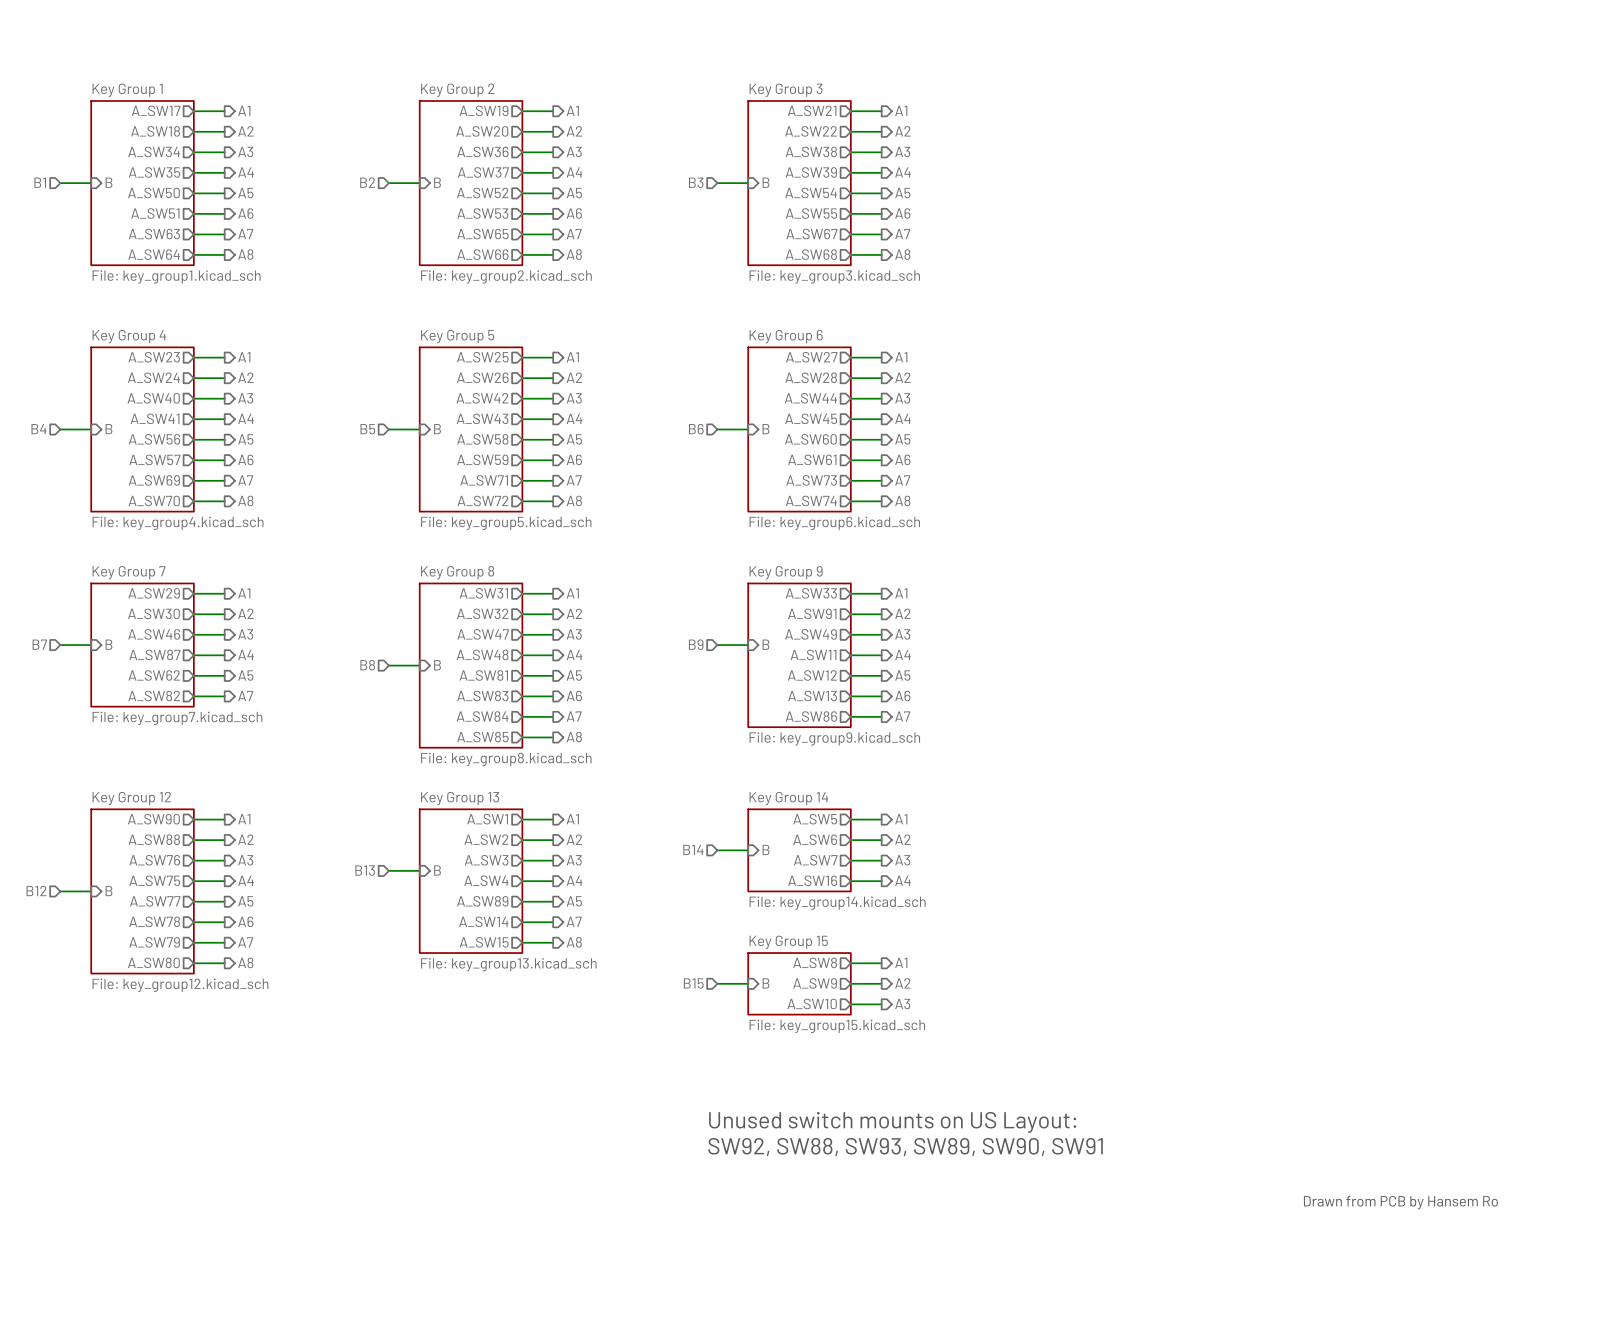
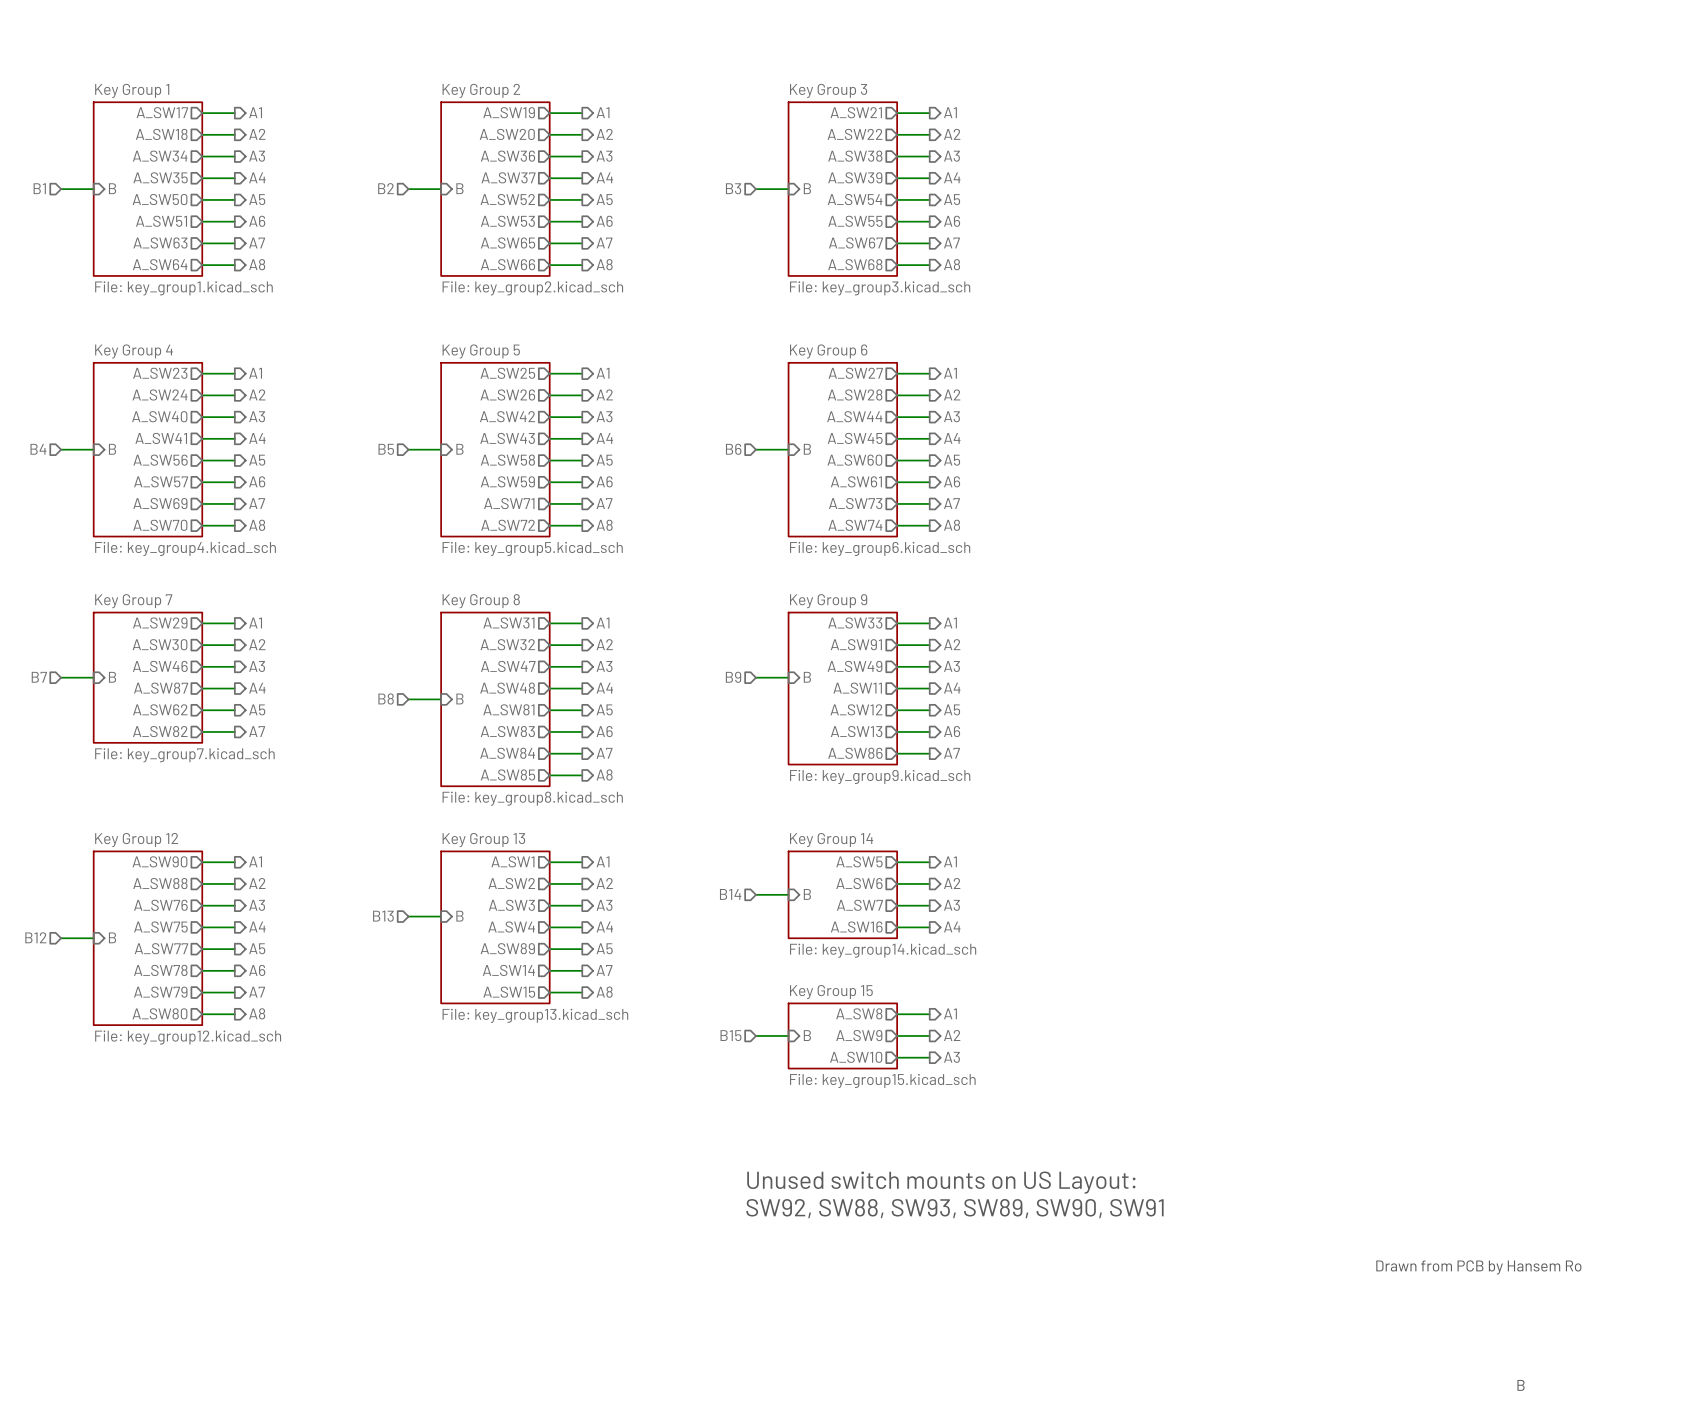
text: none -> B (1521, 1385)

